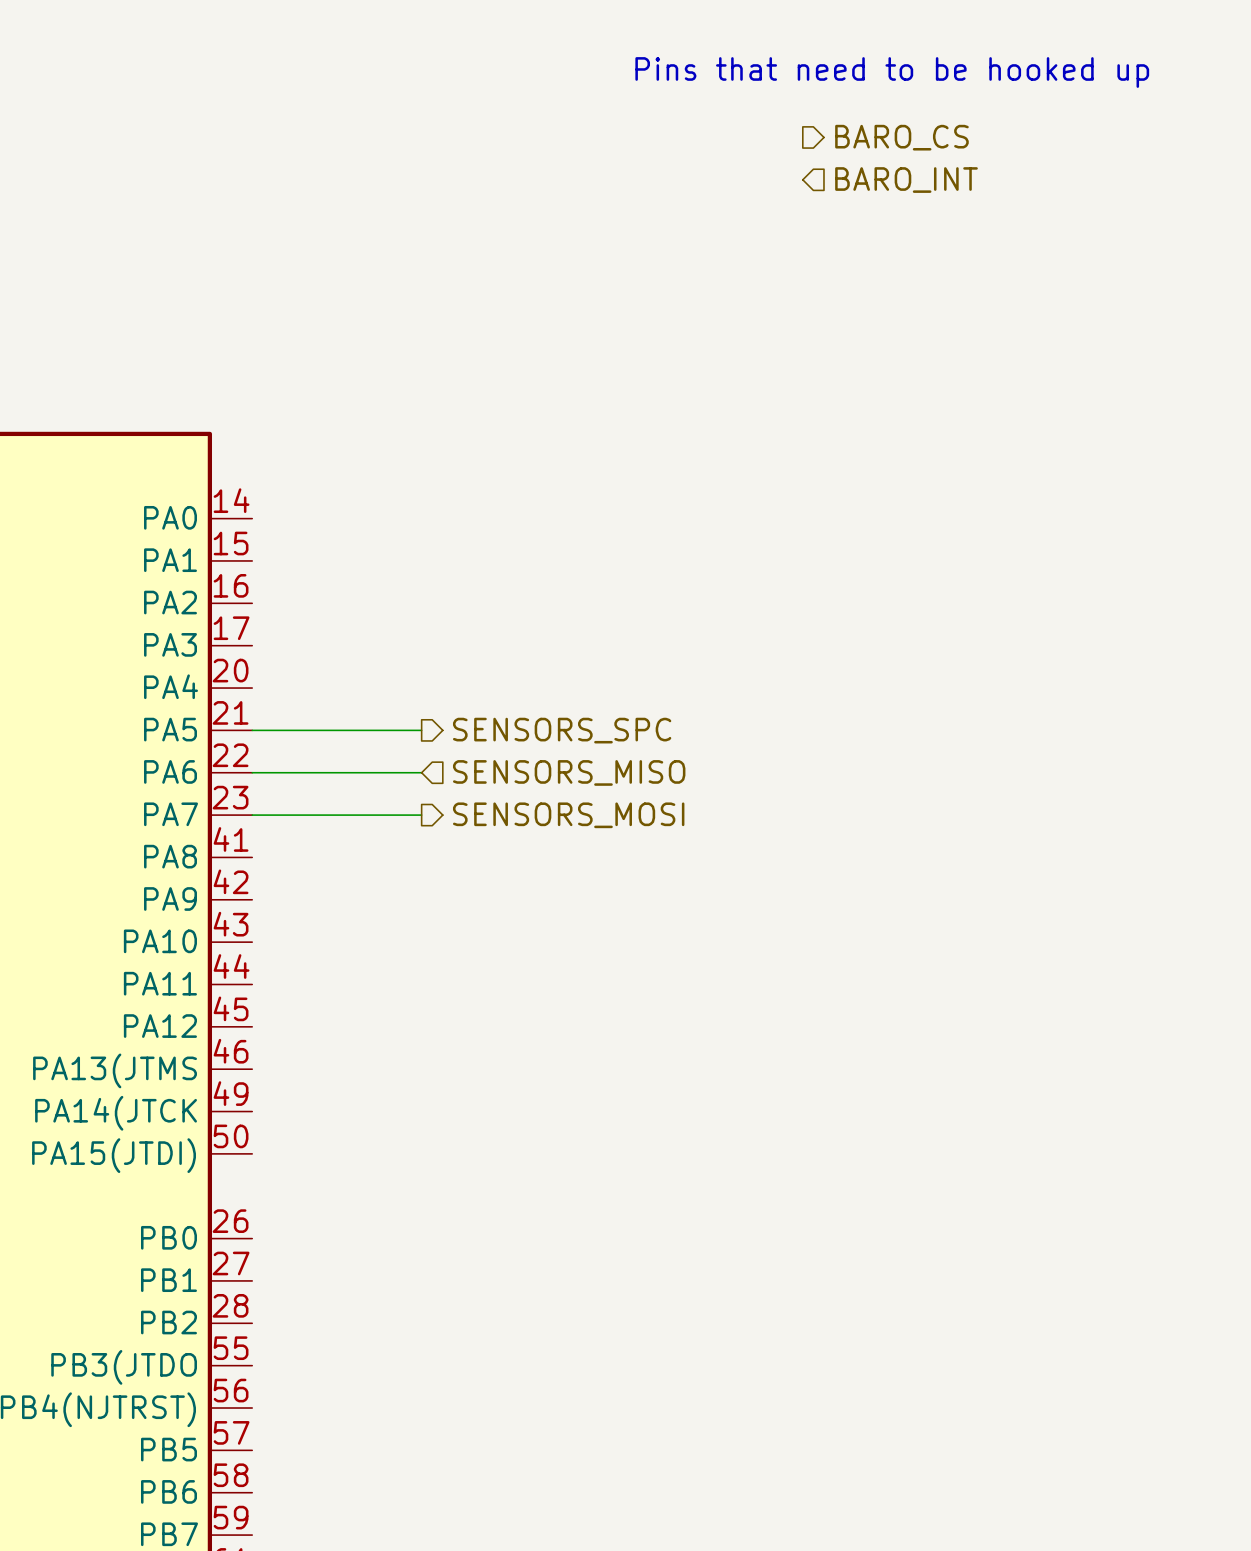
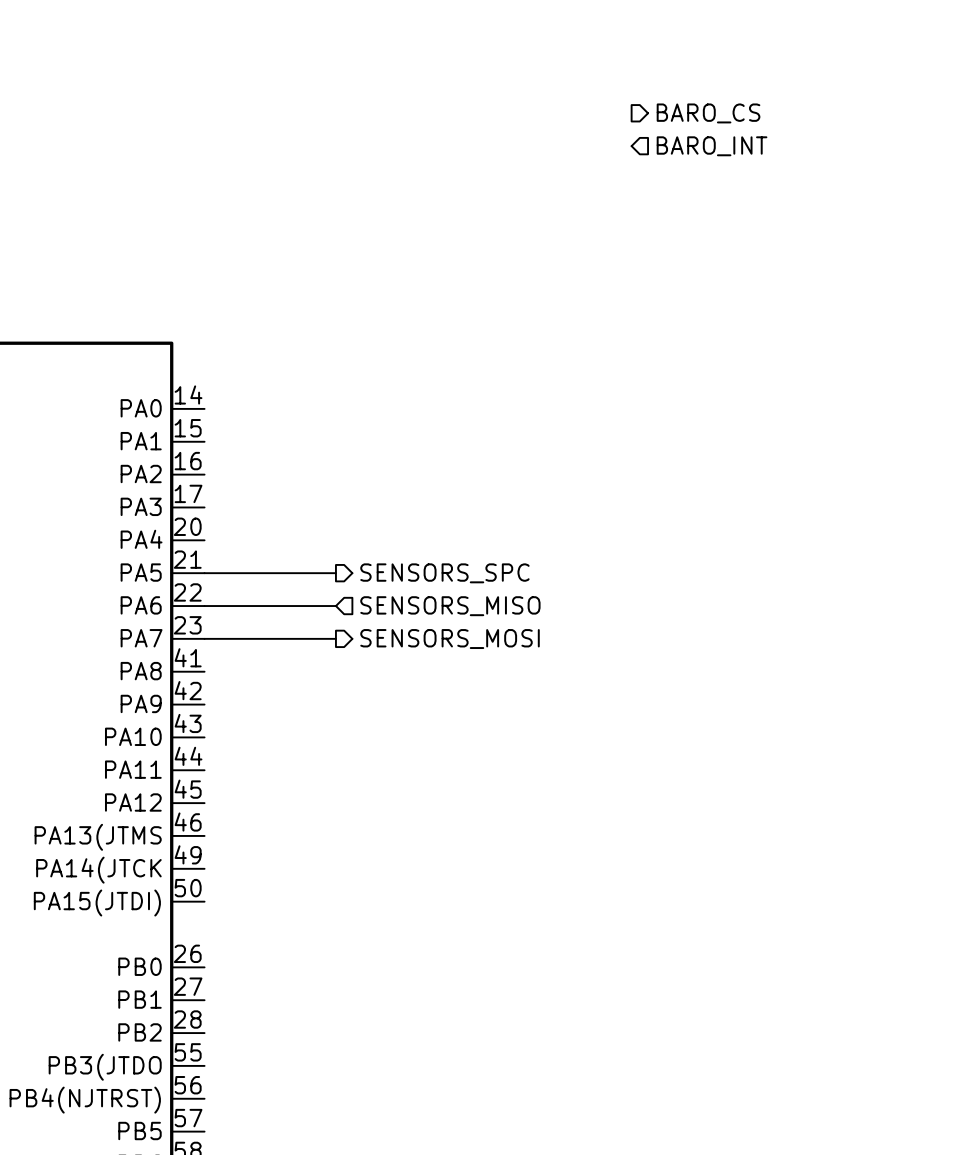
text: Pins that need to be hooked up (892, 72) -> none

